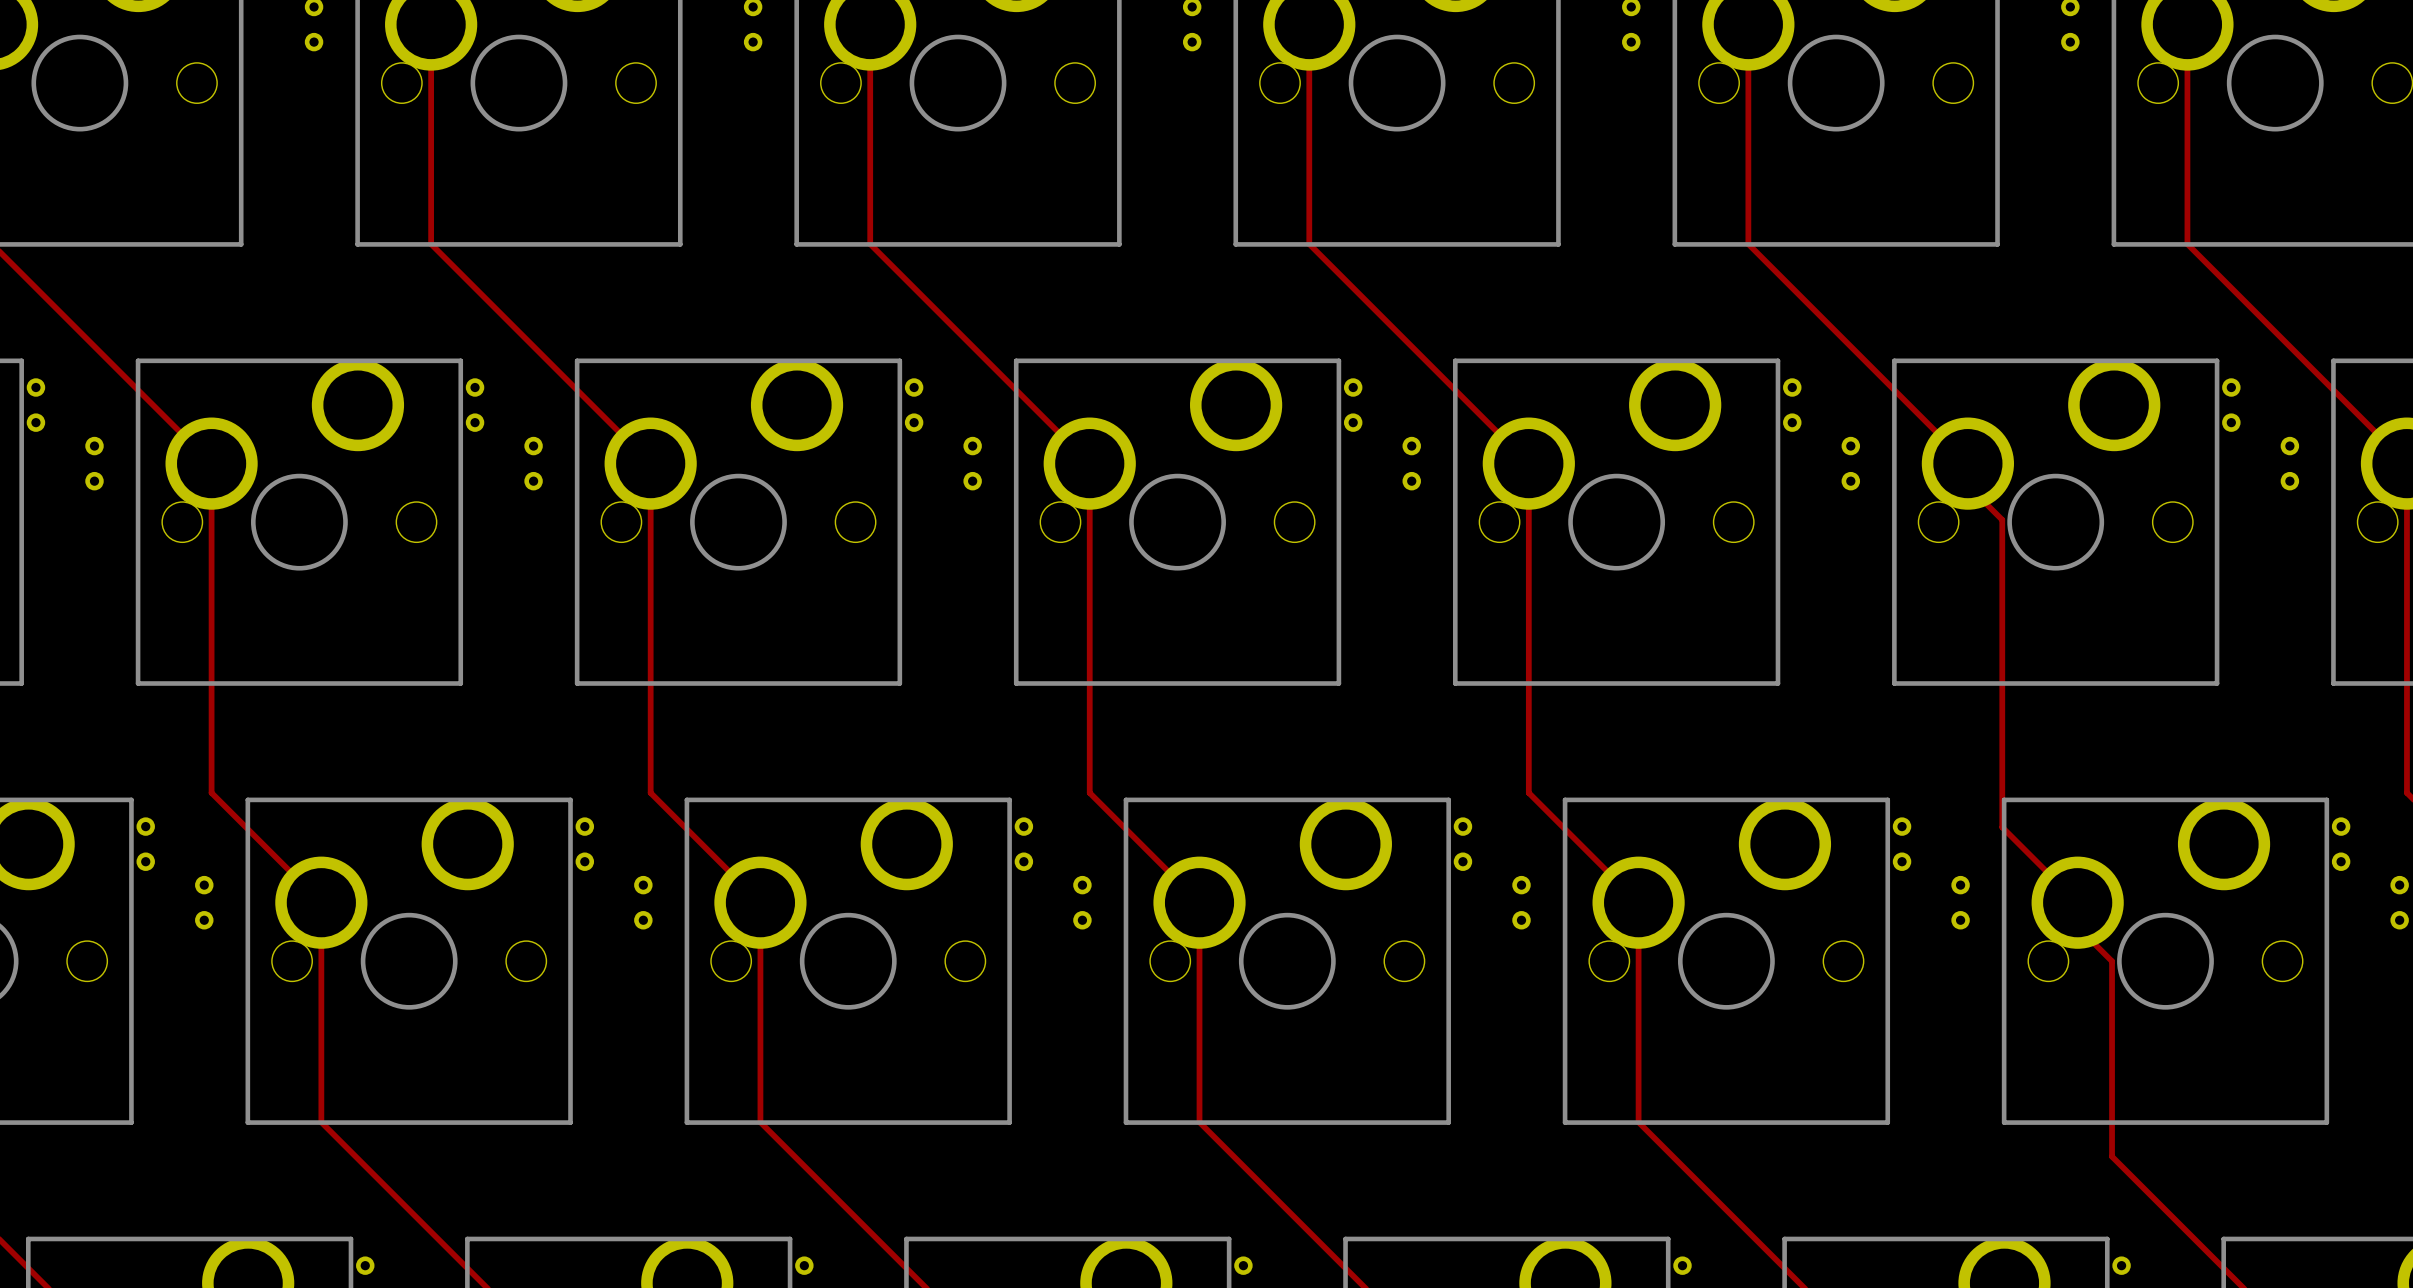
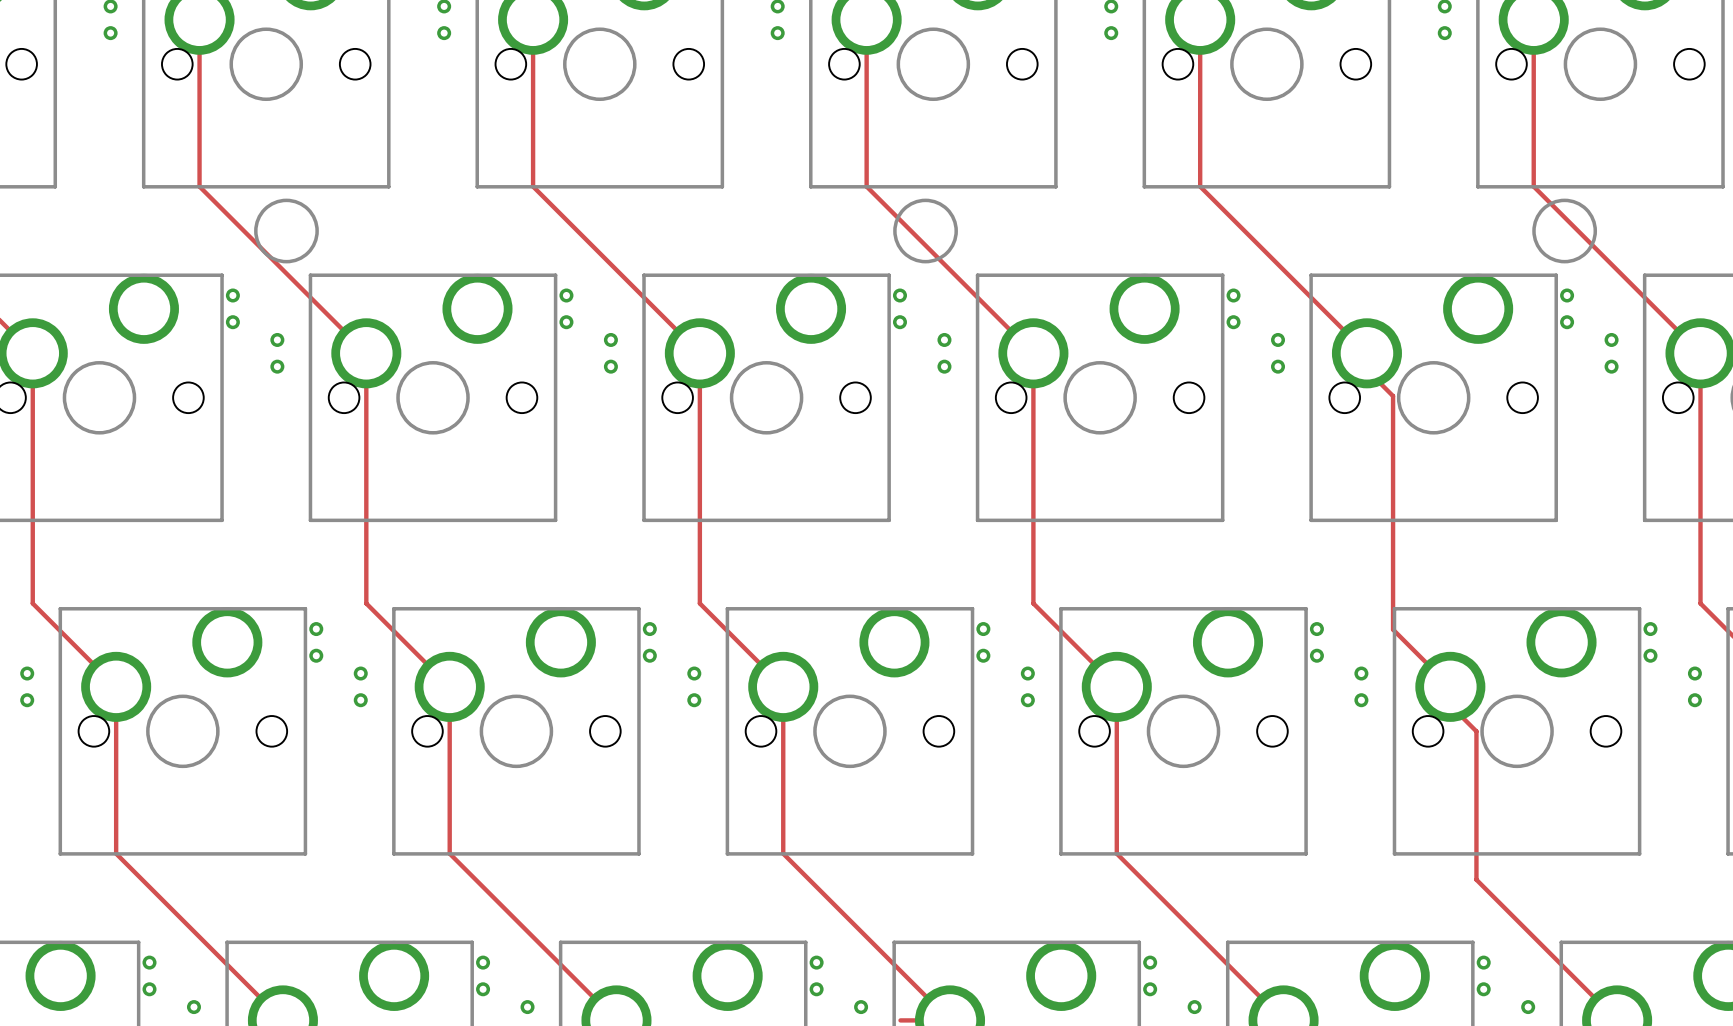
drawing: none -> [254, 198, 319, 264]
drawing: none -> [893, 198, 958, 264]
drawing: none -> [1532, 198, 1598, 264]

